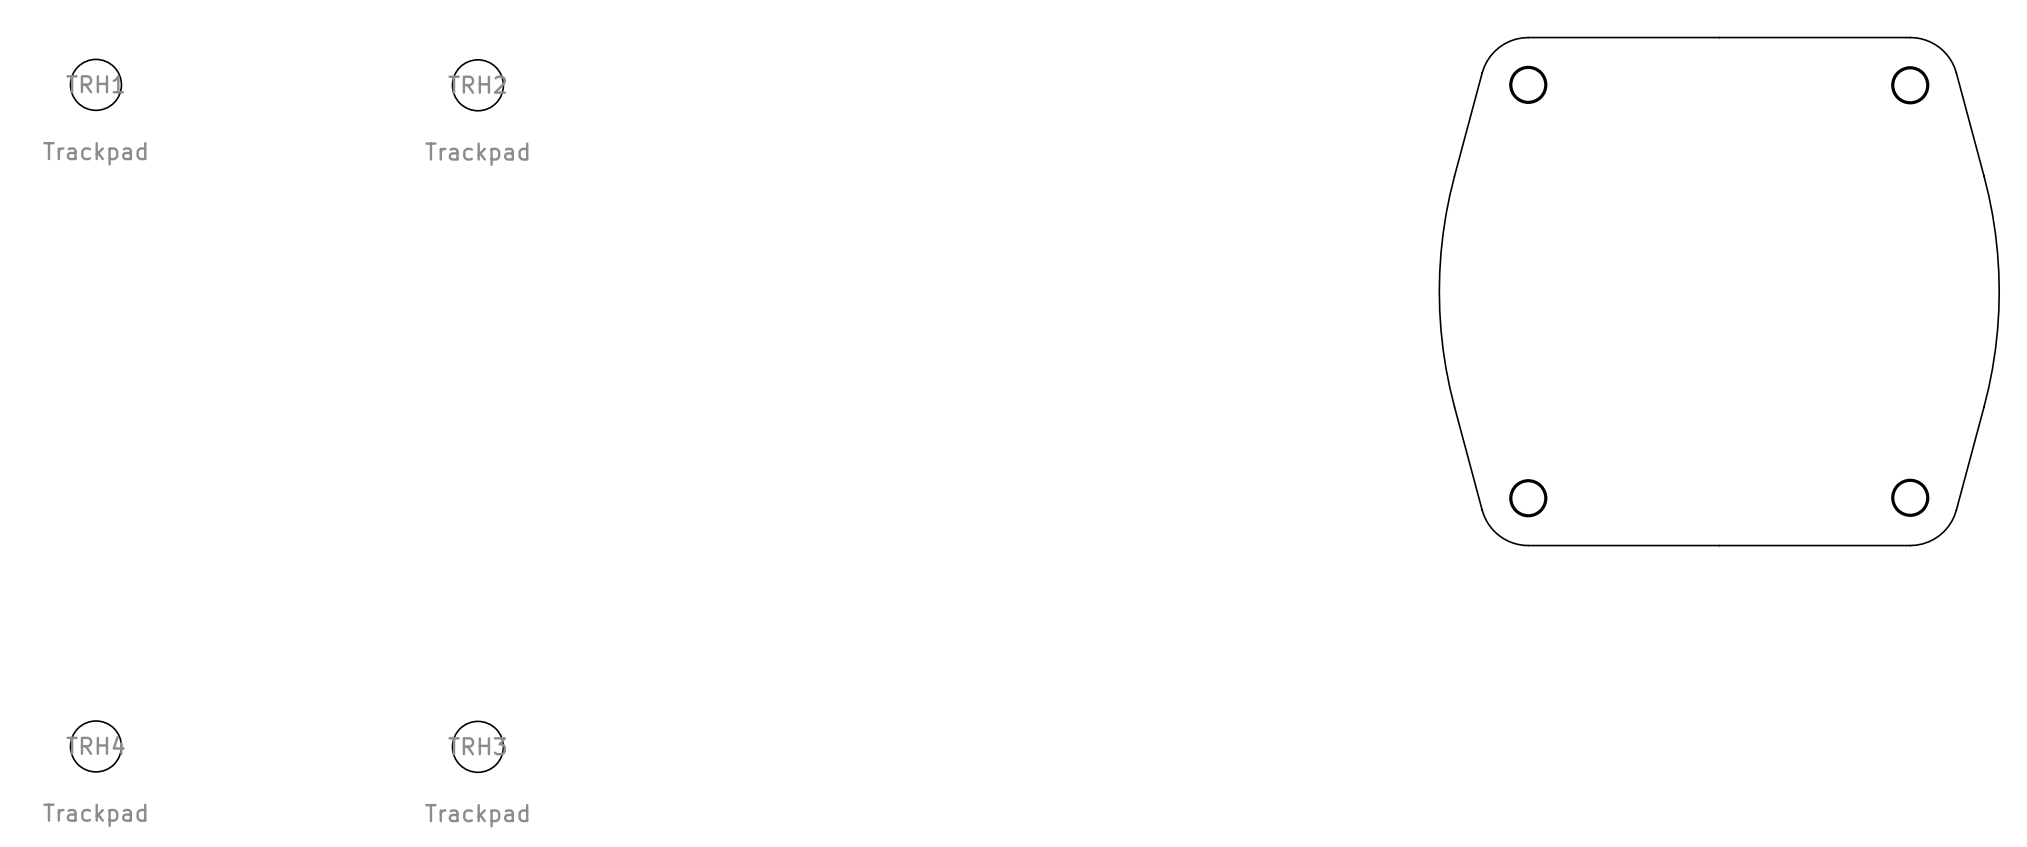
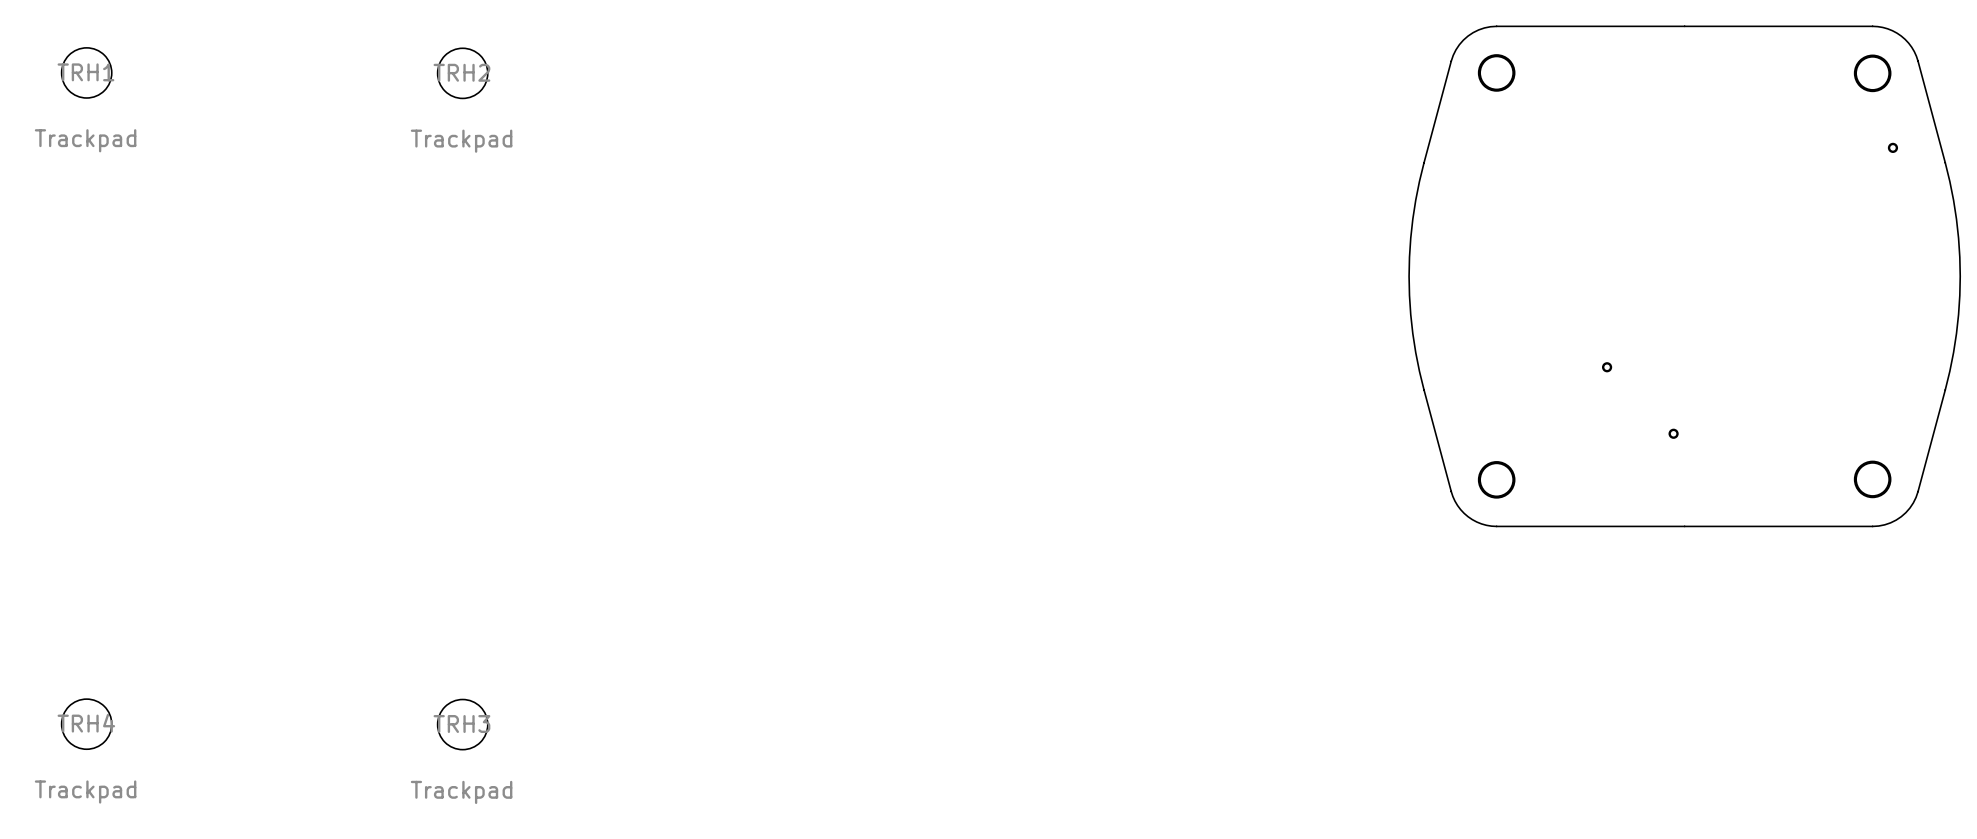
round board edge: none -> [1887, 142, 1899, 153]
round board edge: none -> [1601, 362, 1613, 373]
round board edge: none -> [1668, 428, 1679, 439]

